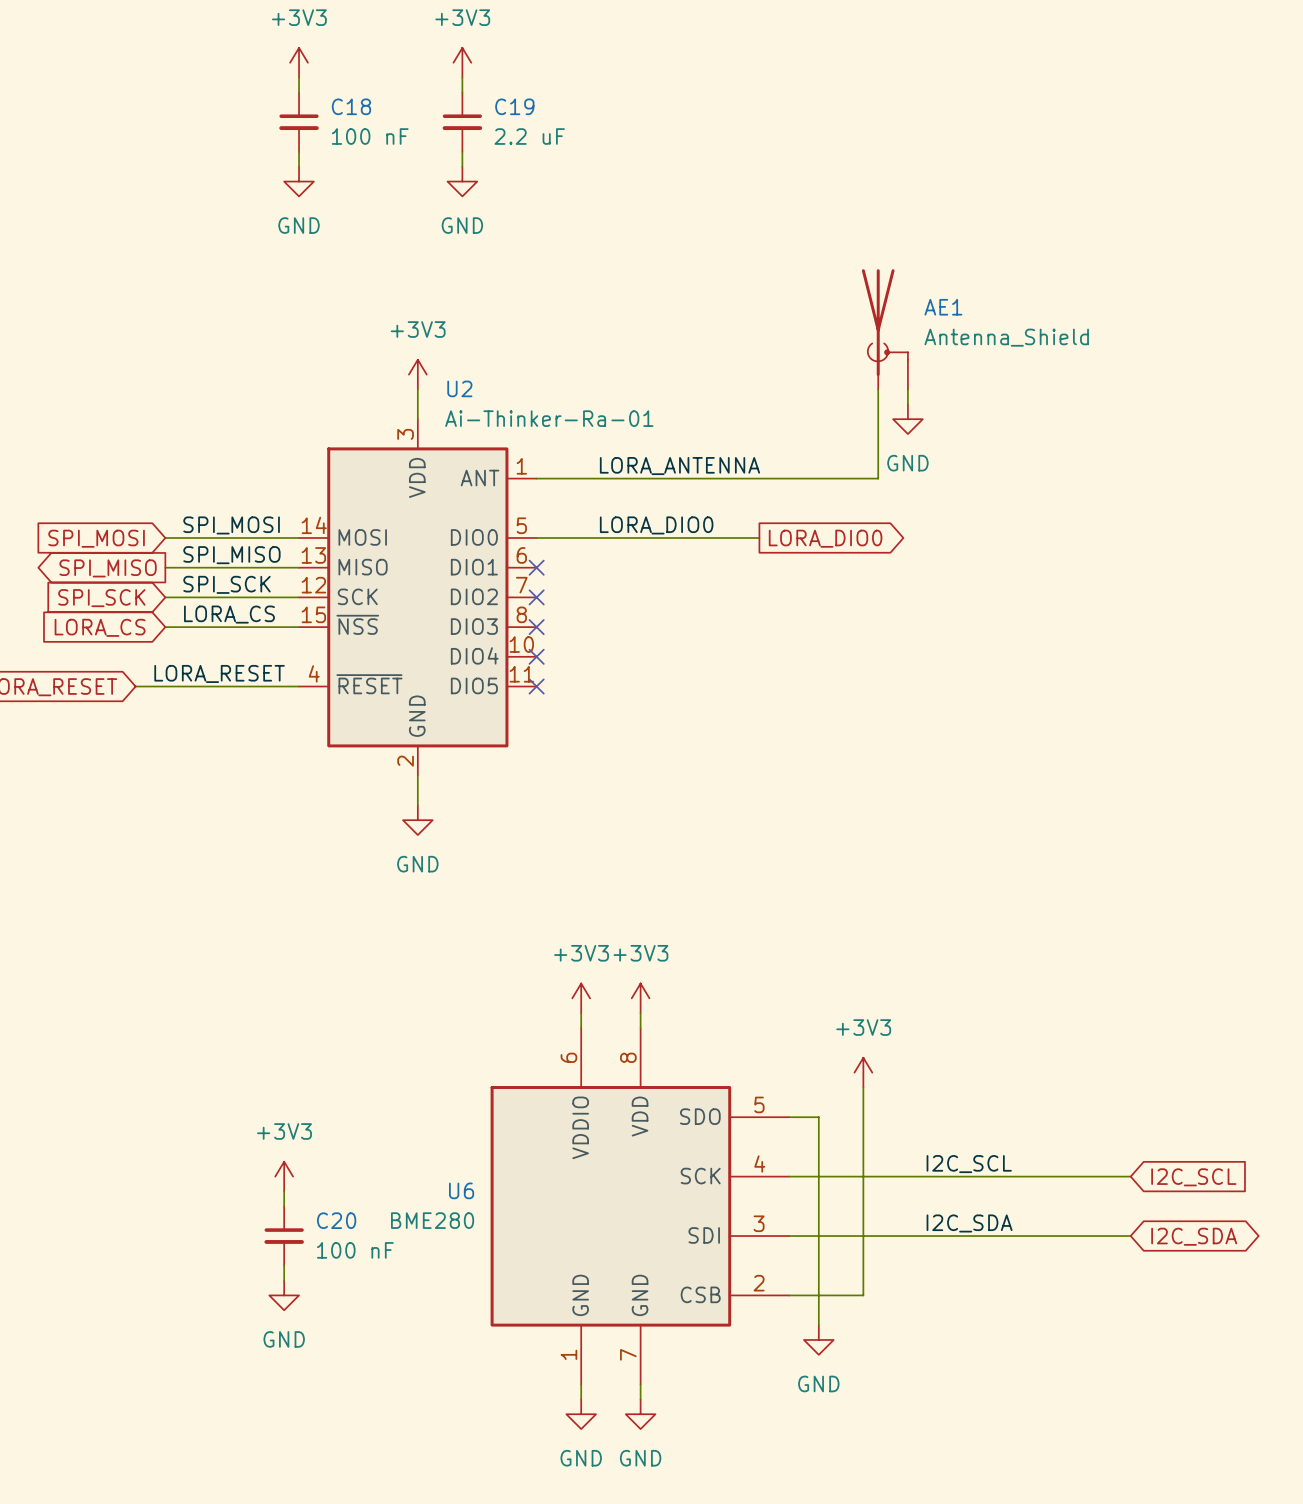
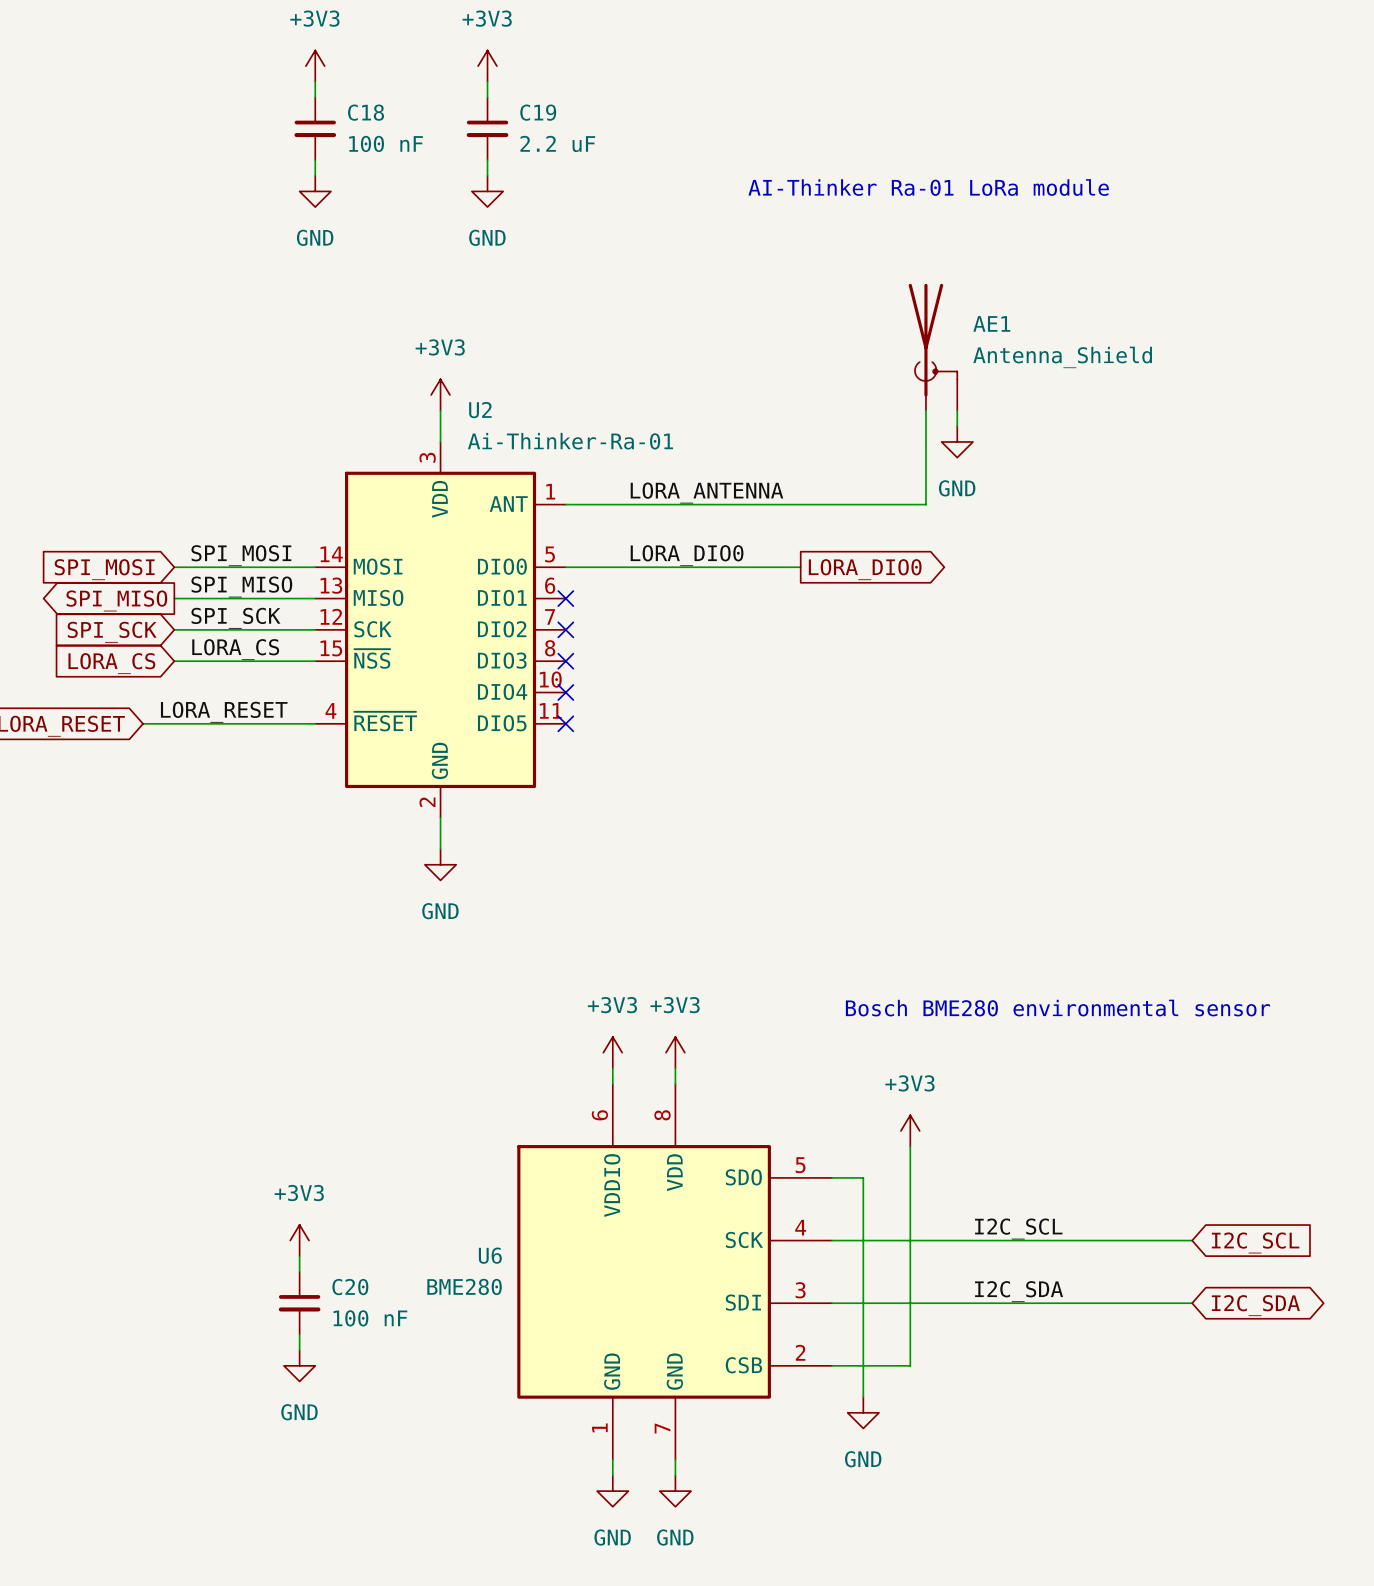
text: none -> AI-Thinker Ra-01 LoRa module (928, 187)
text: none -> Bosch BME280 environmental sensor (1057, 1008)

